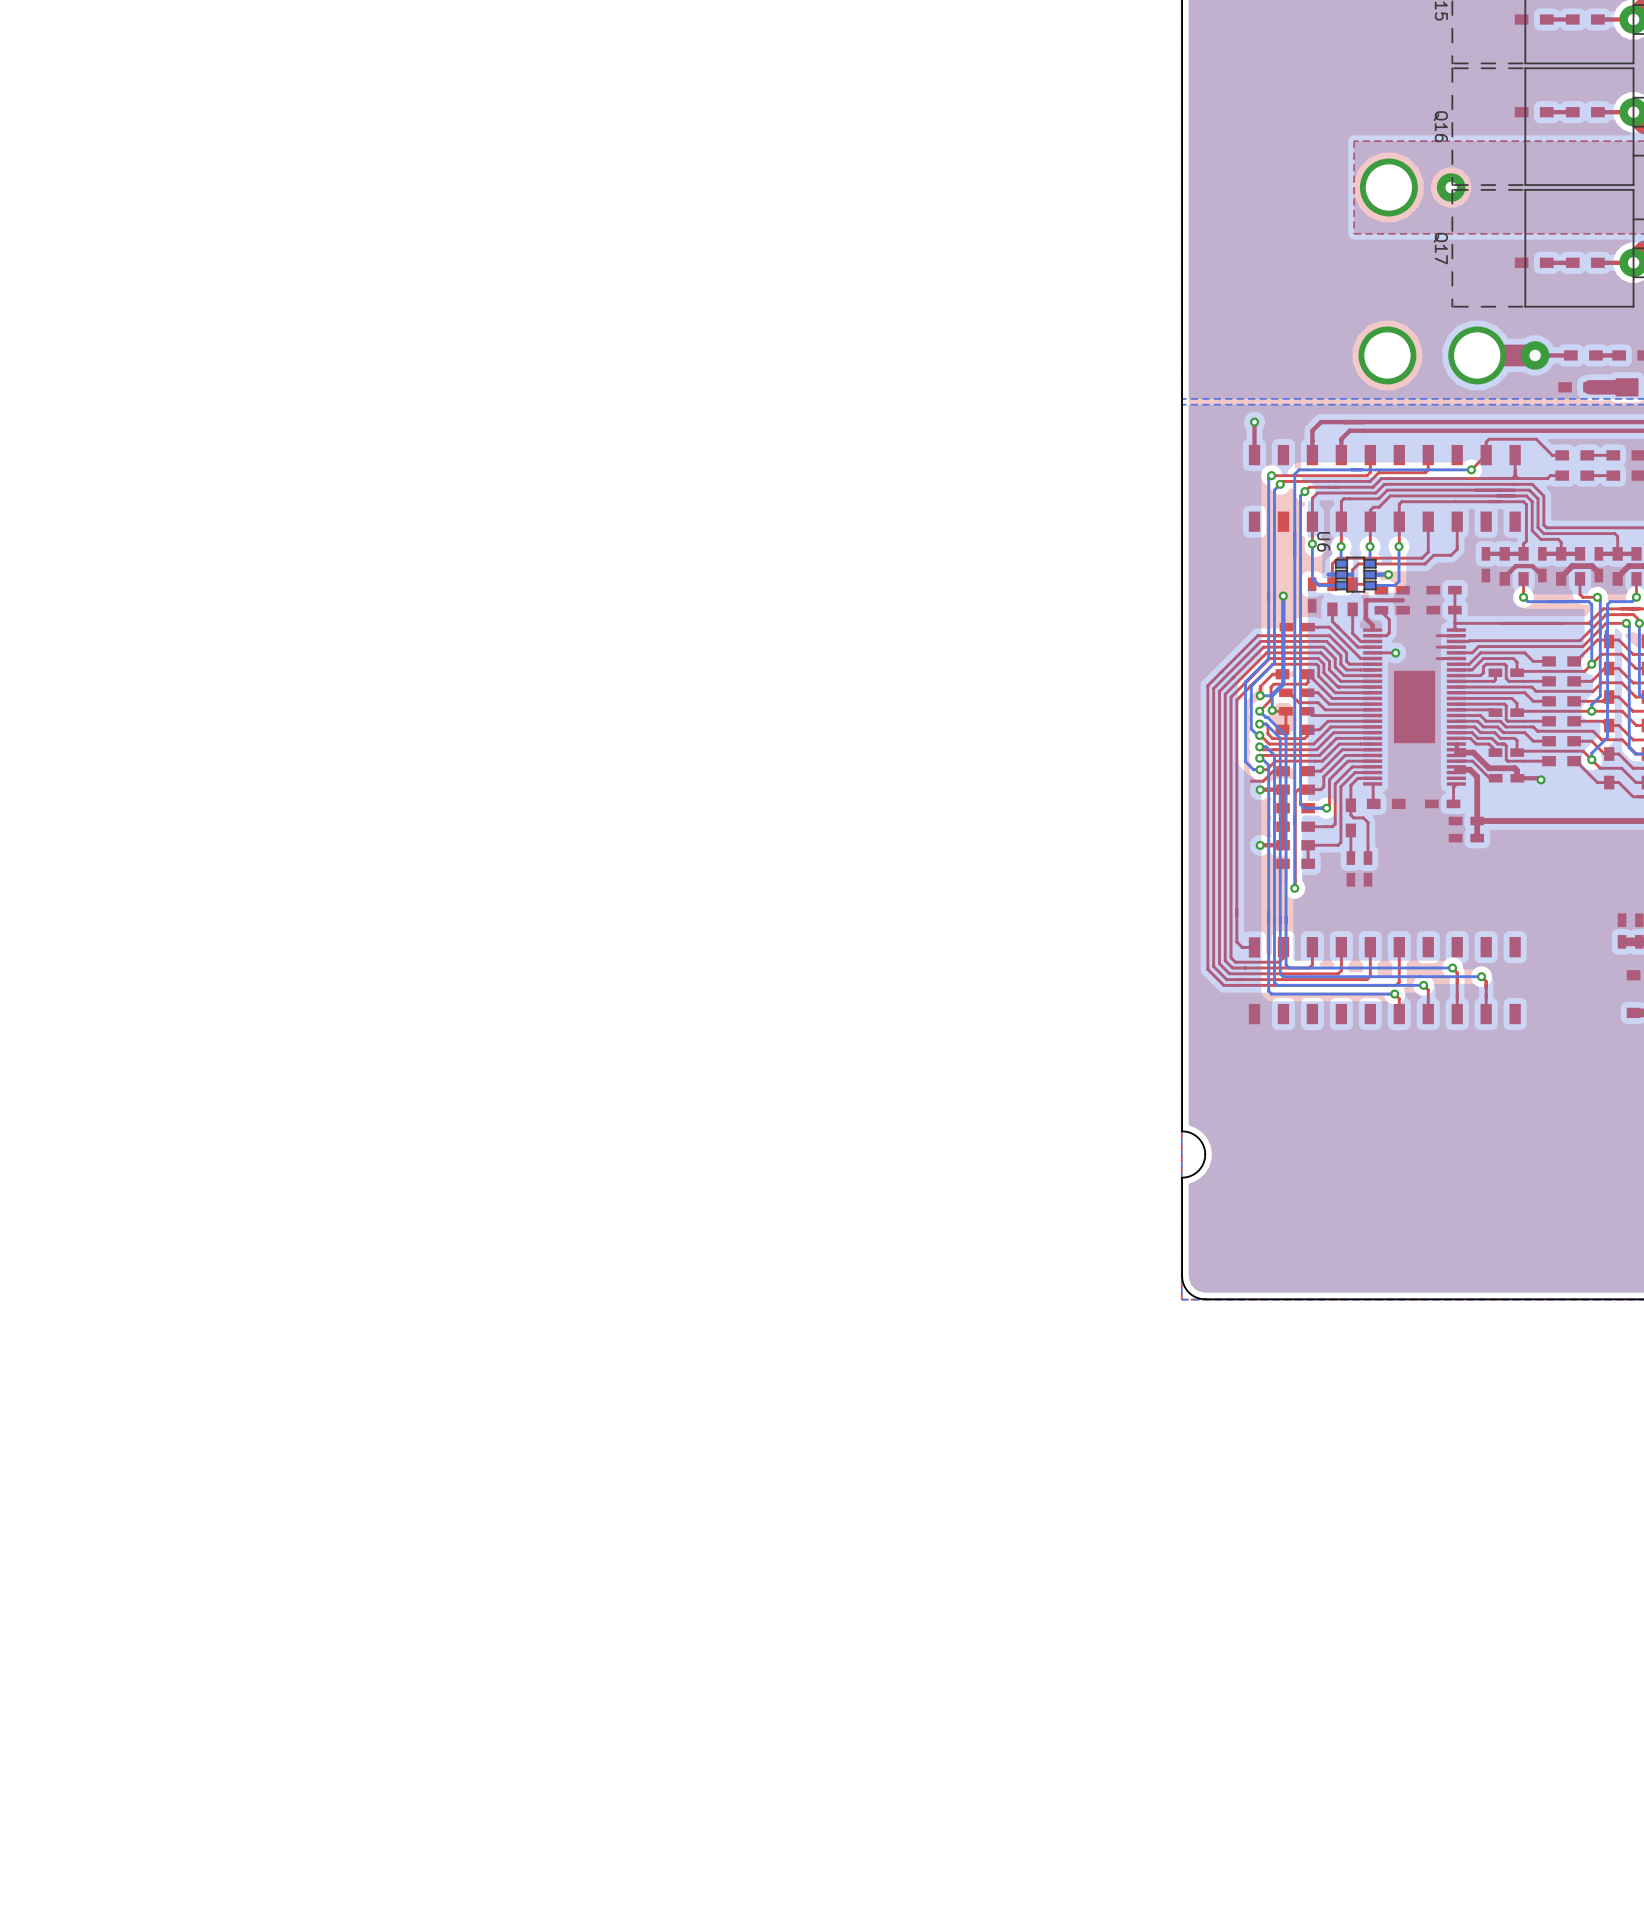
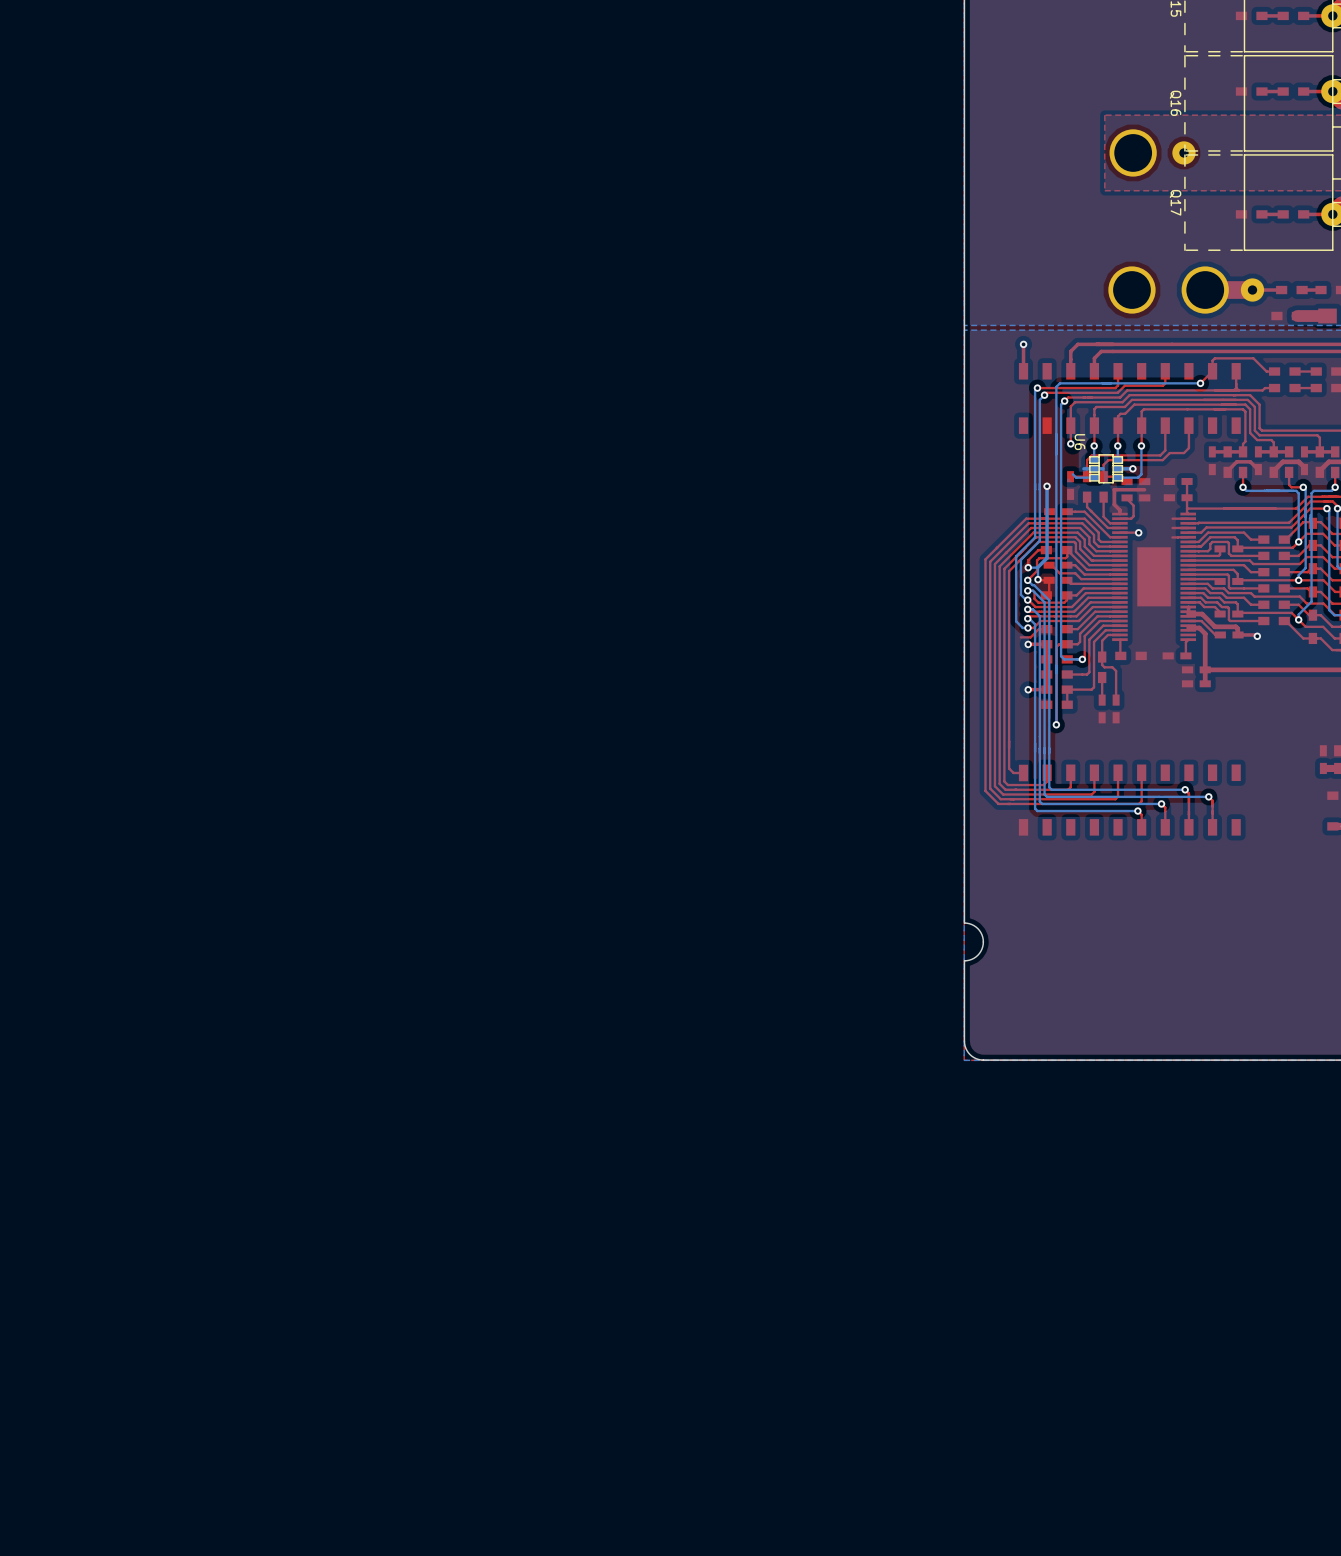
bottom track: (1312, 544) (1312, 578) (1315, 581) -> none

